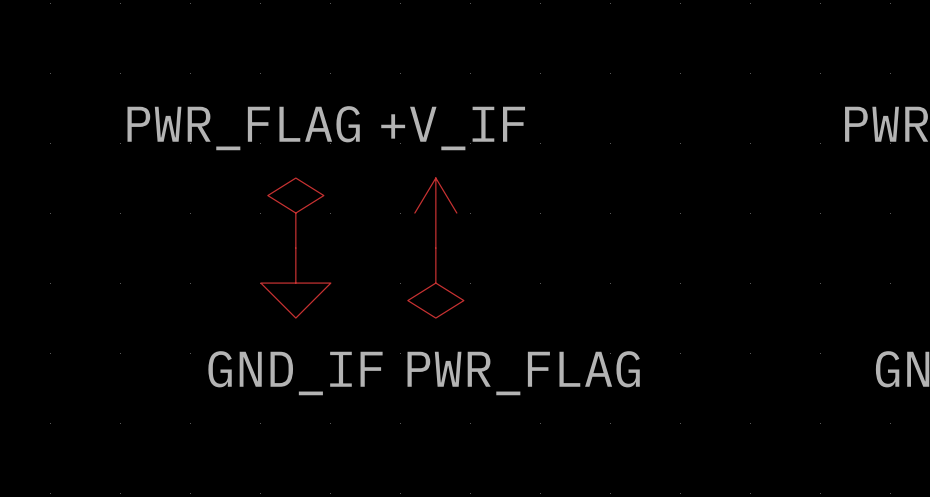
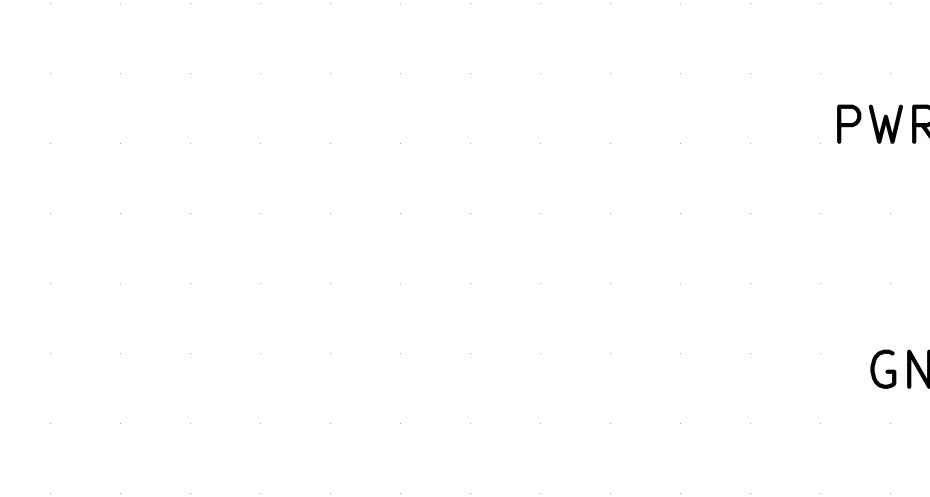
power symbol: PWR_FLAG (295, 213) -> none
power symbol: +V_IF (435, 213) -> none
power symbol: GND_IF (295, 283) -> none
power symbol: PWR_FLAG (435, 283) -> none

